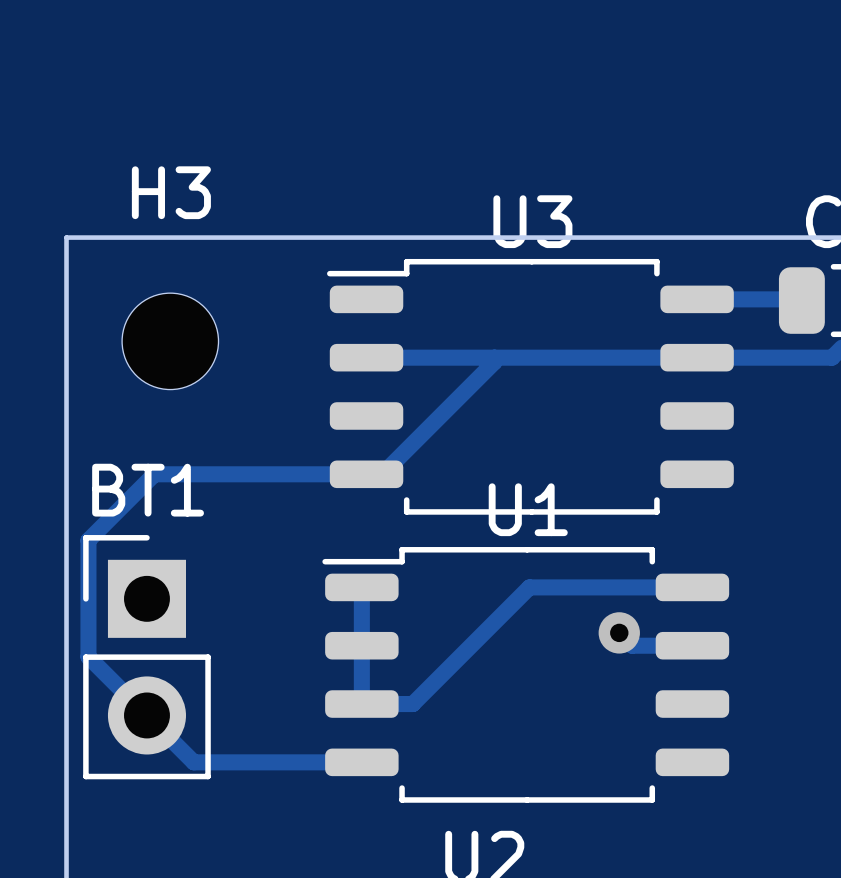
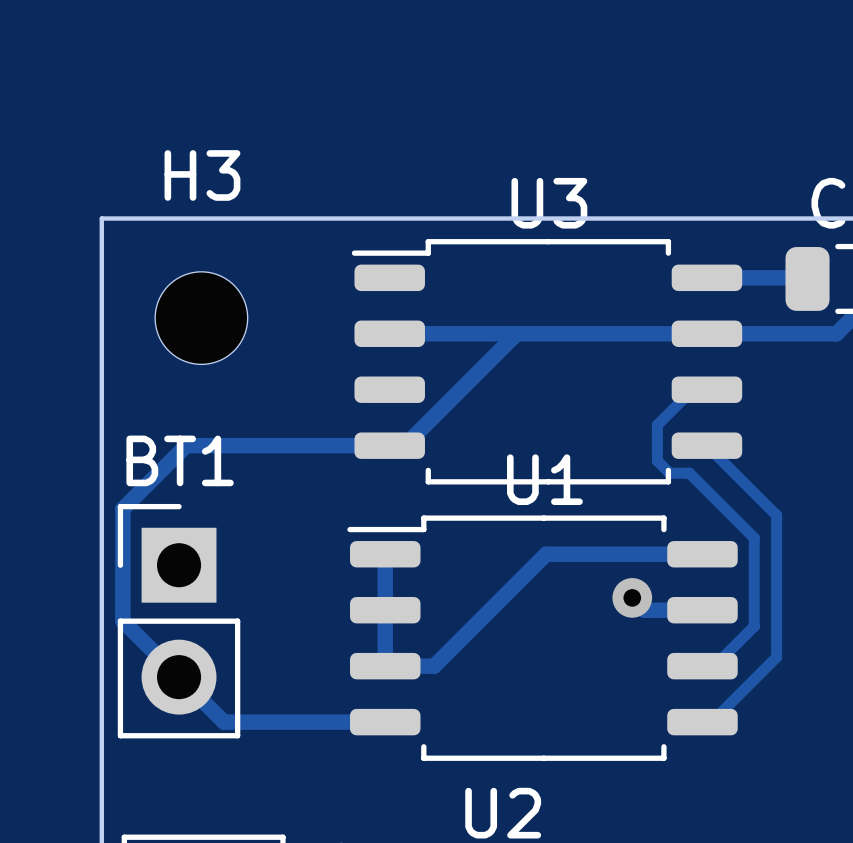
track: none -> (706, 389) (692, 389) (657, 425) (657, 460) (669, 473) (689, 473) (754, 538) (754, 626) (714, 666) (702, 666)
track: none -> (706, 445) (776, 515) (776, 657) (711, 722) (702, 722)

